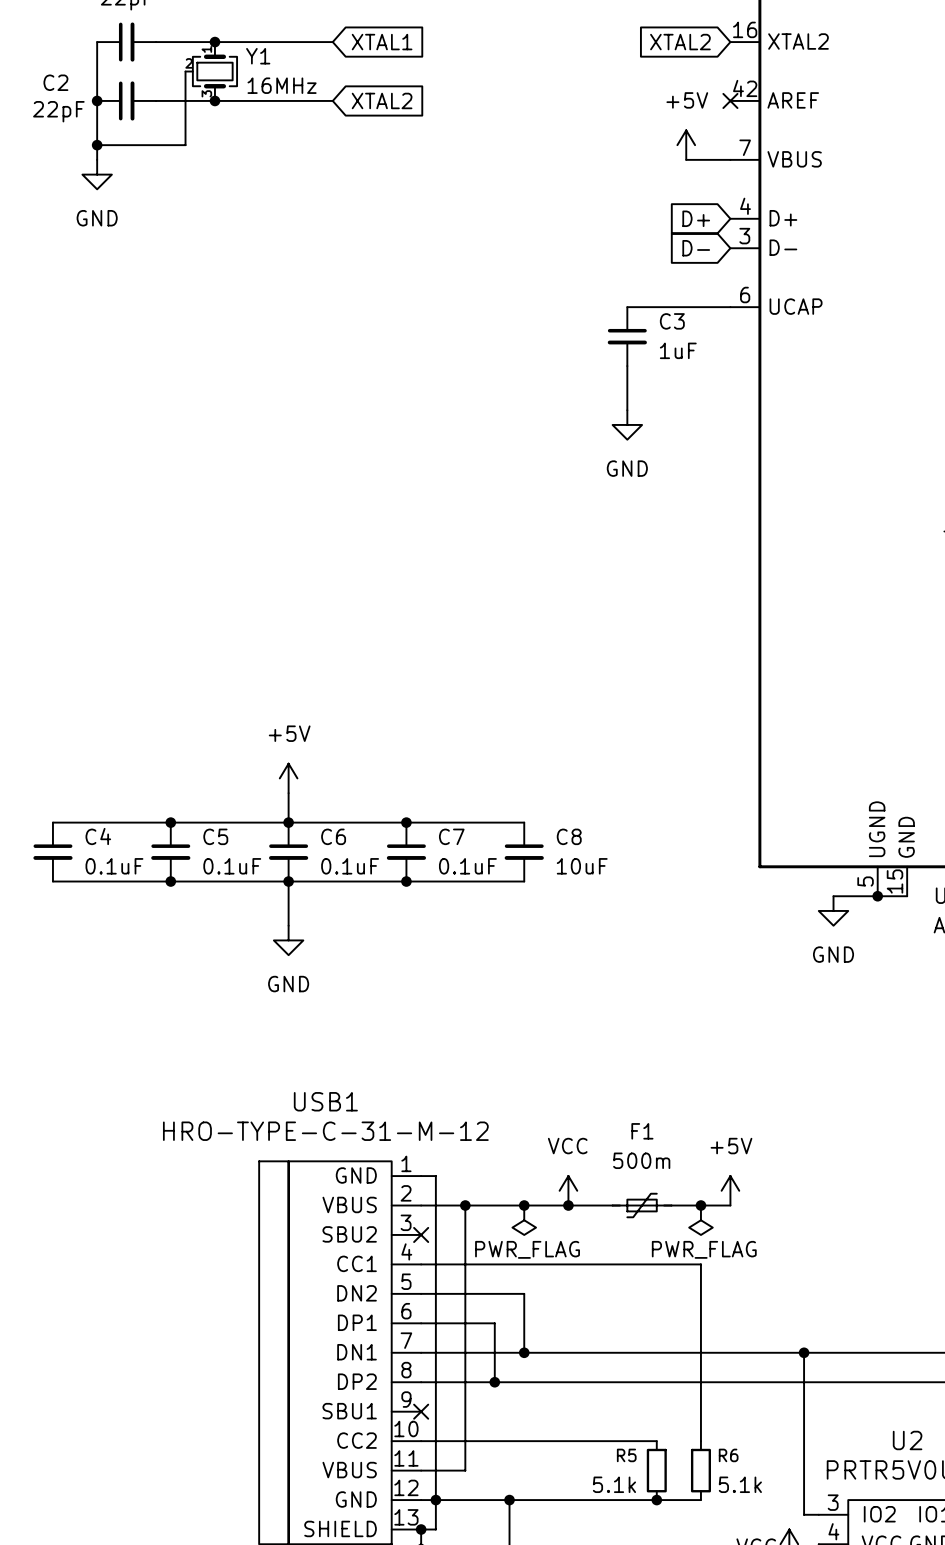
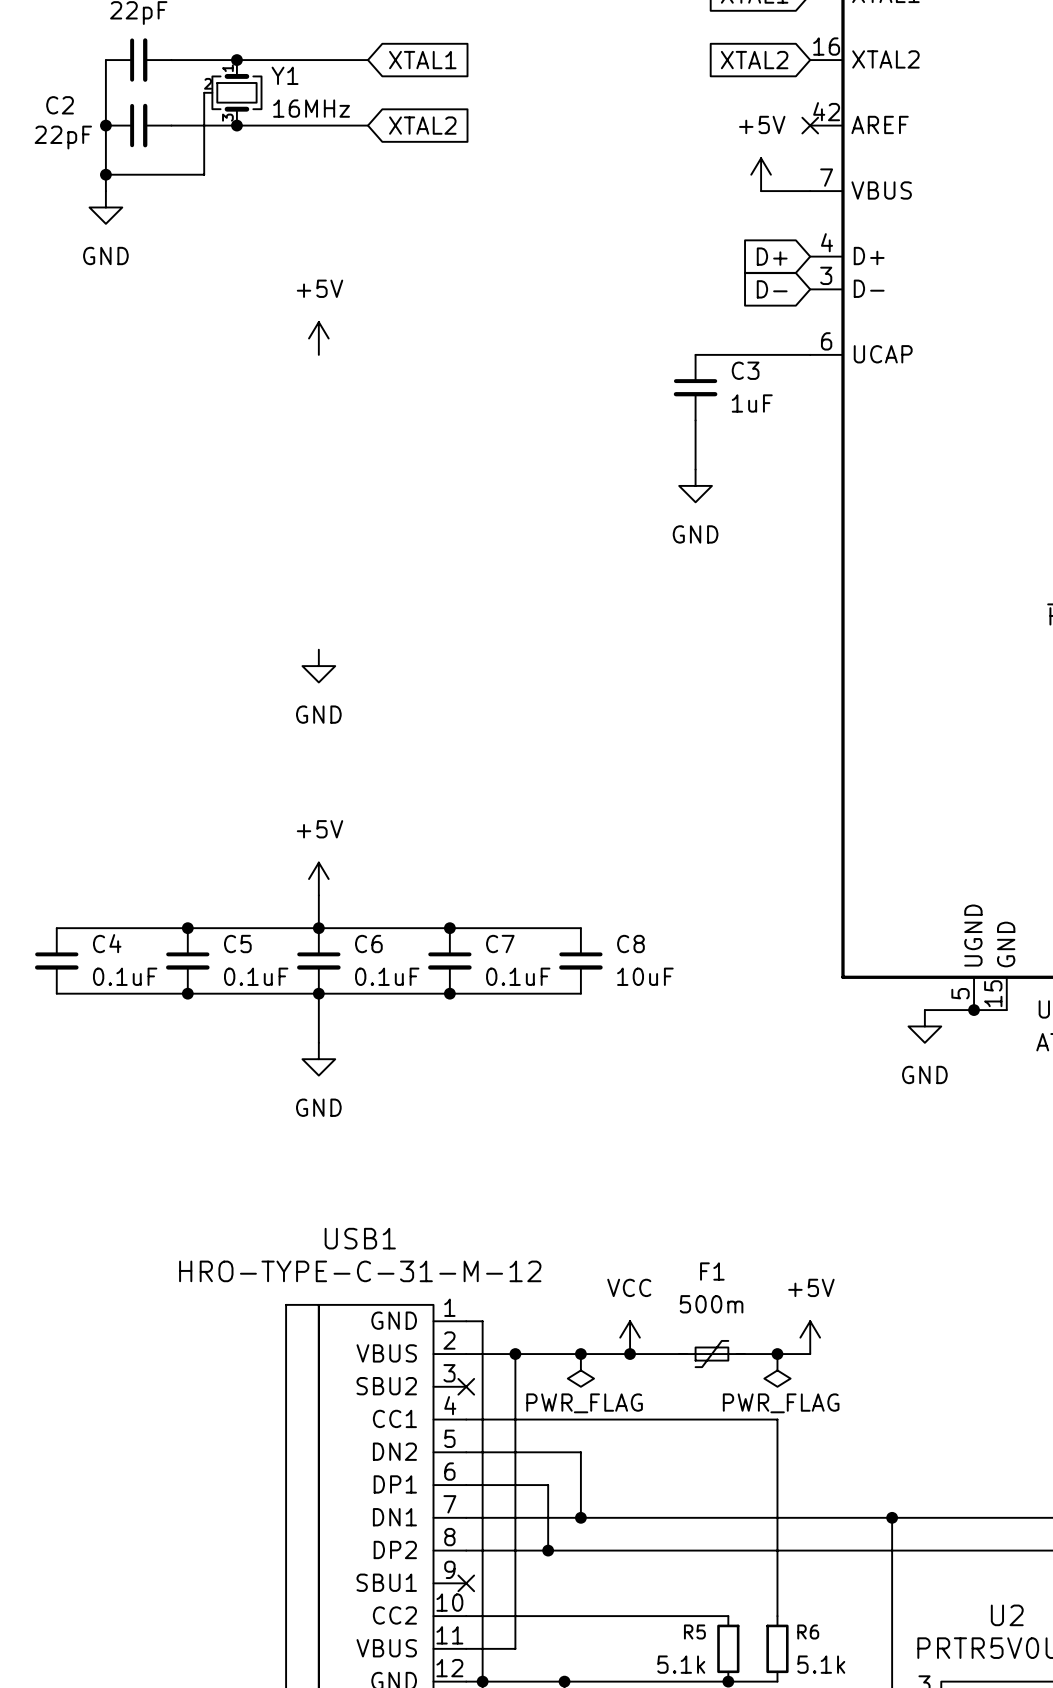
power symbol: none -> +5V (318, 338)
power symbol: none -> GND (318, 666)

